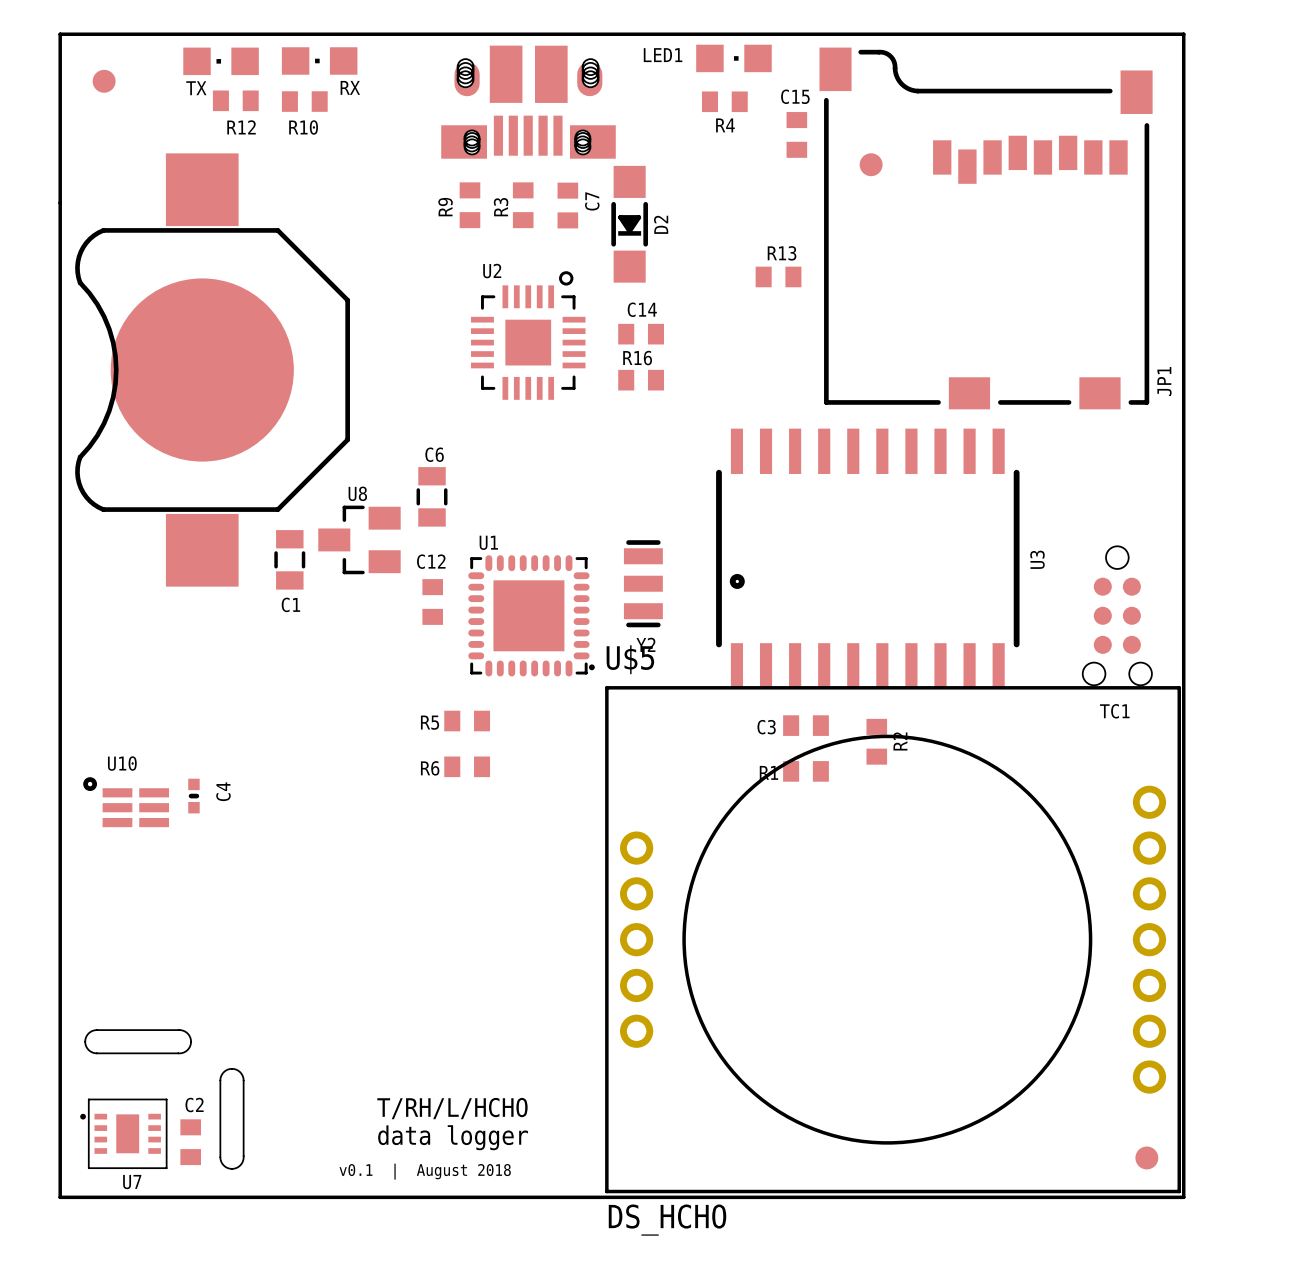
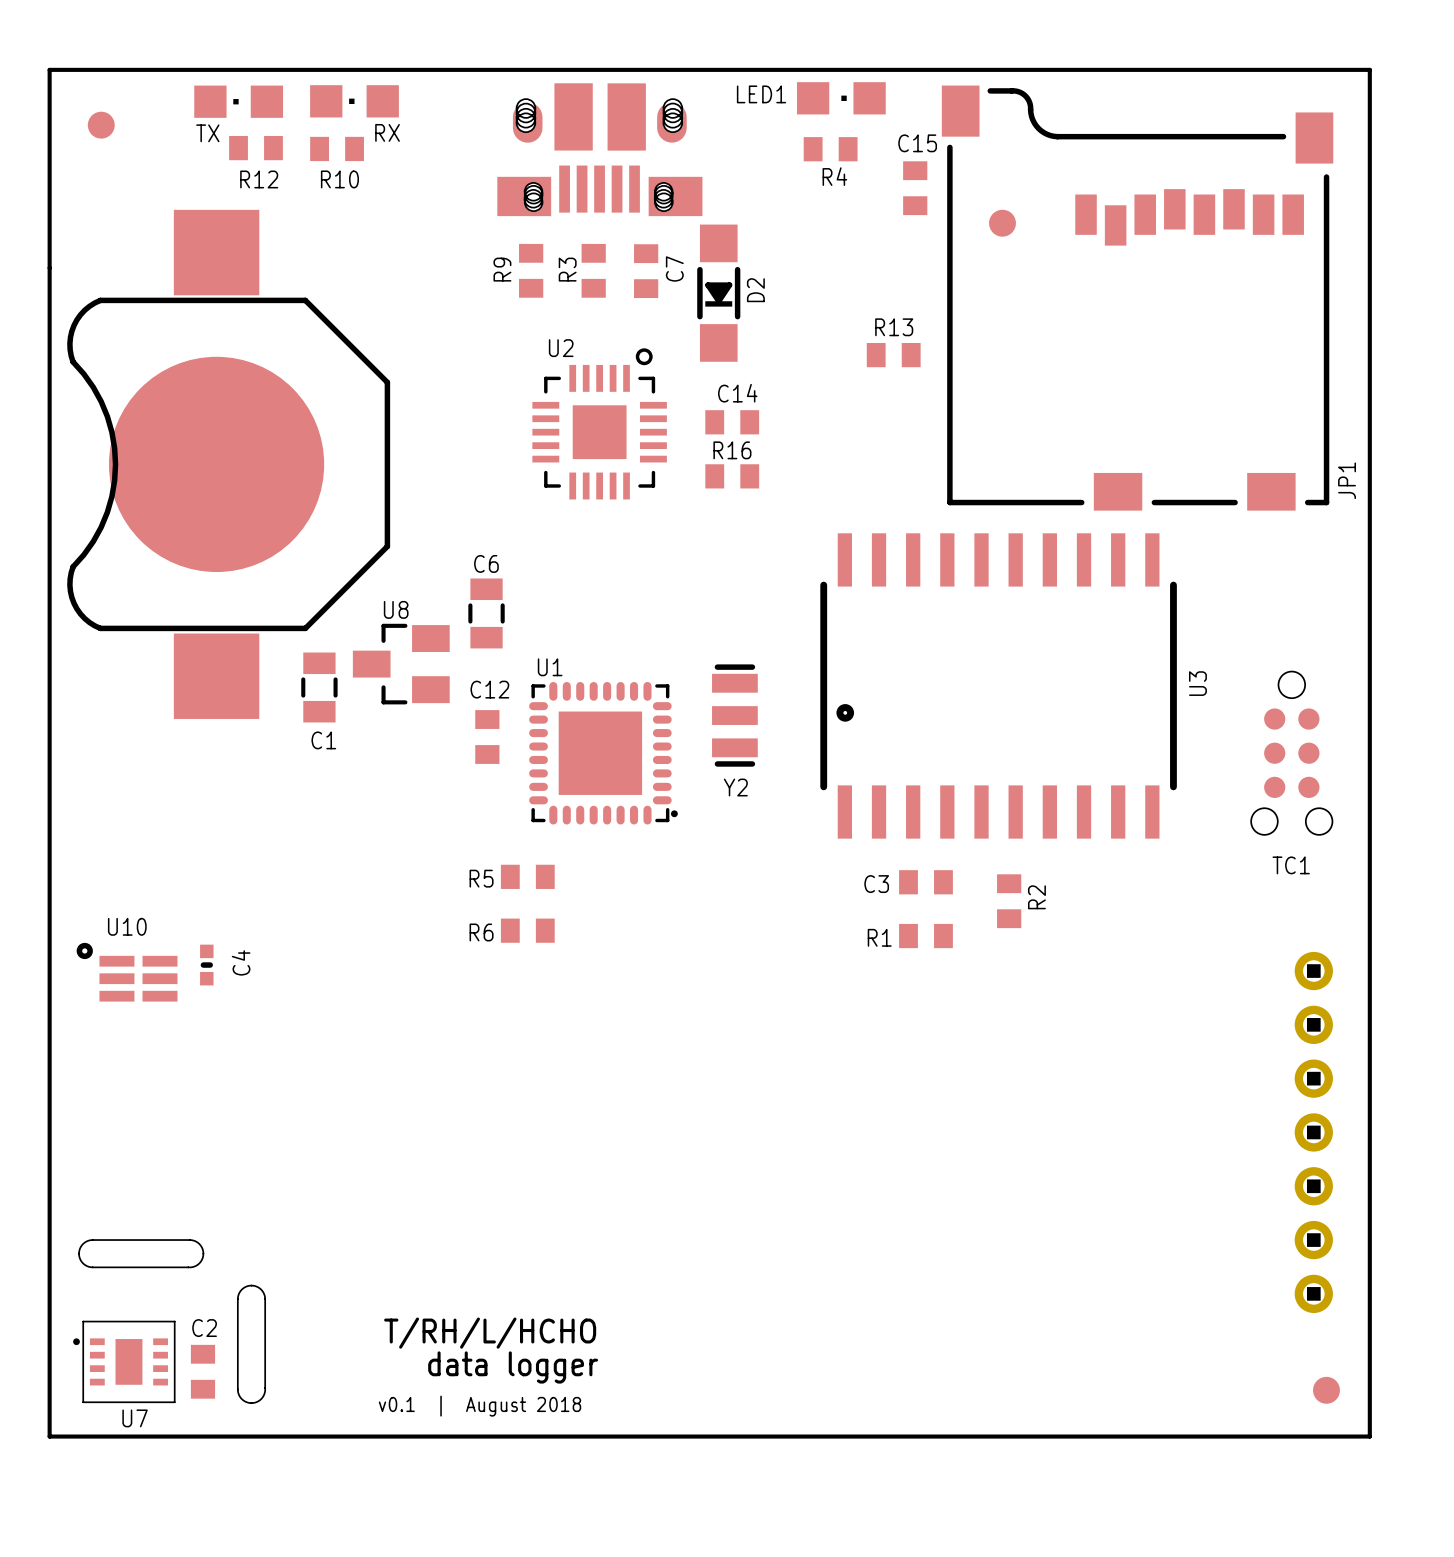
part: none -> (1313, 1132)
U$5: DS_HCHO (893, 939) -> none

